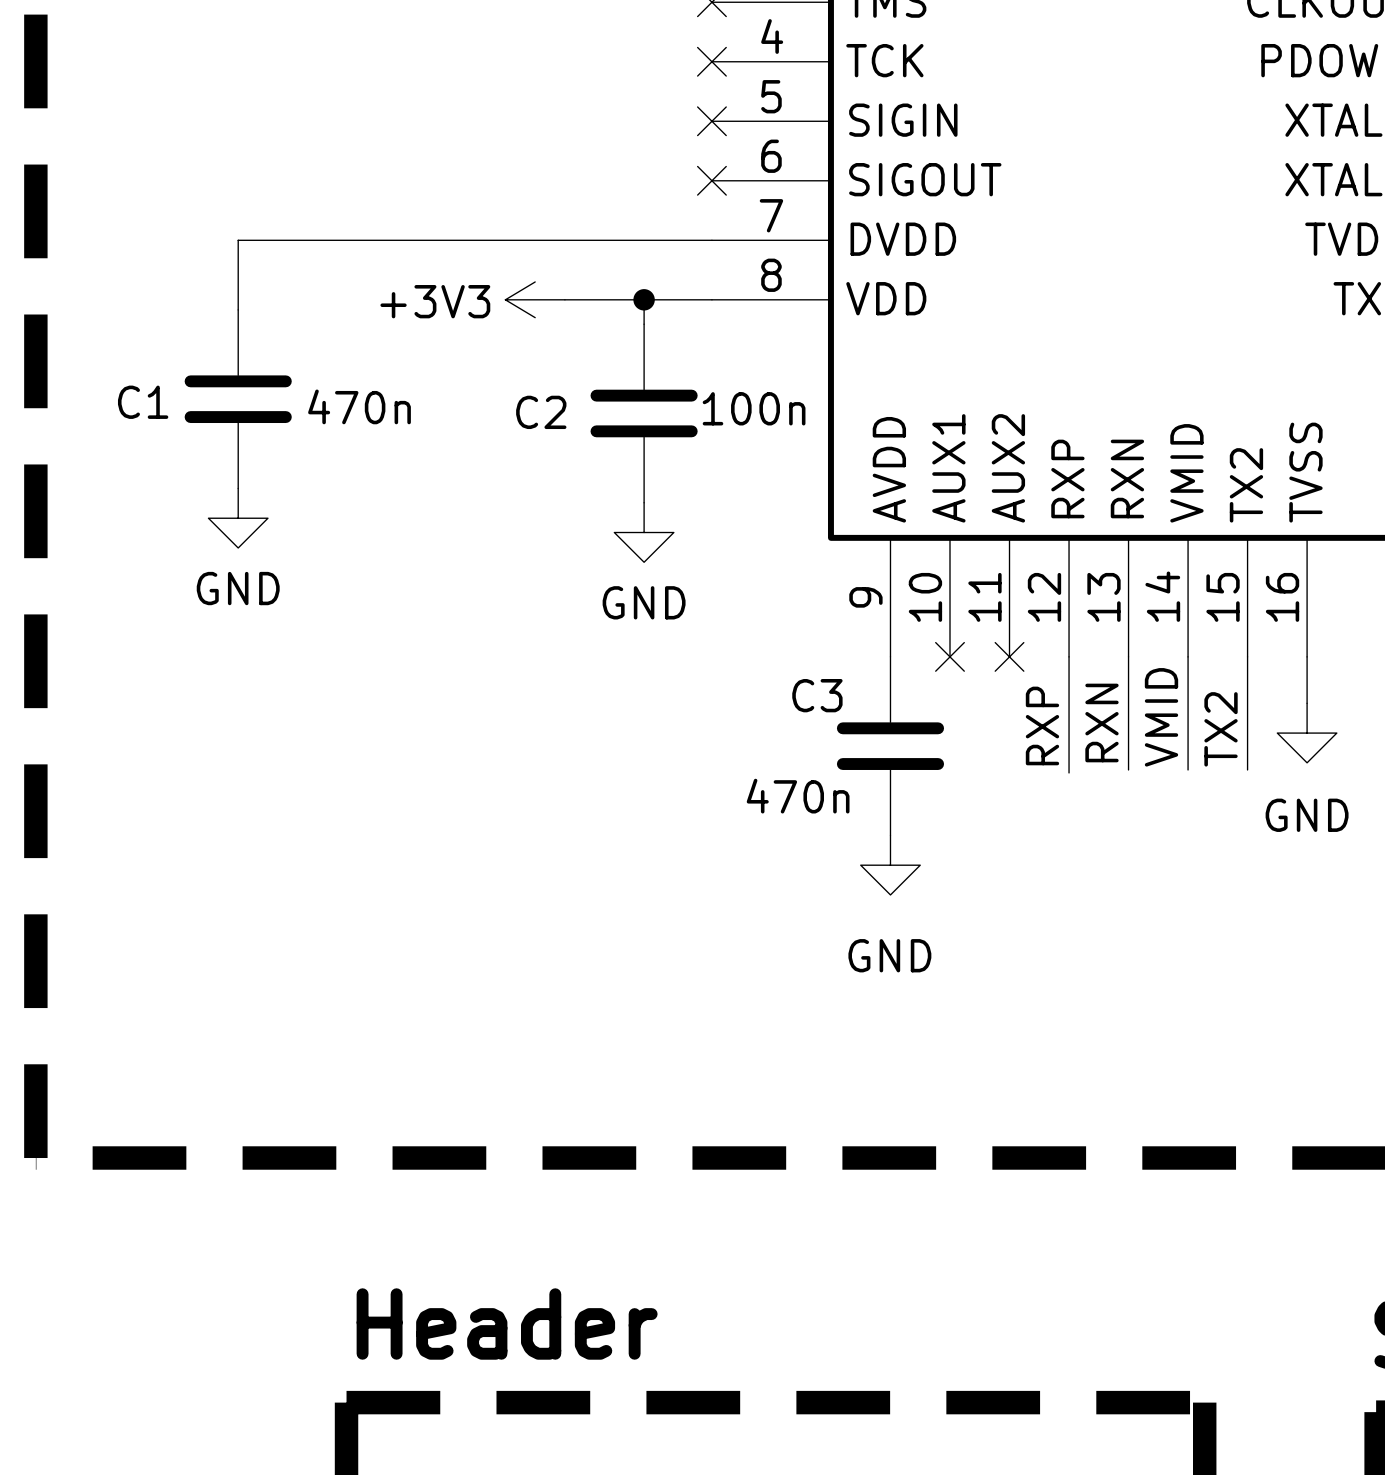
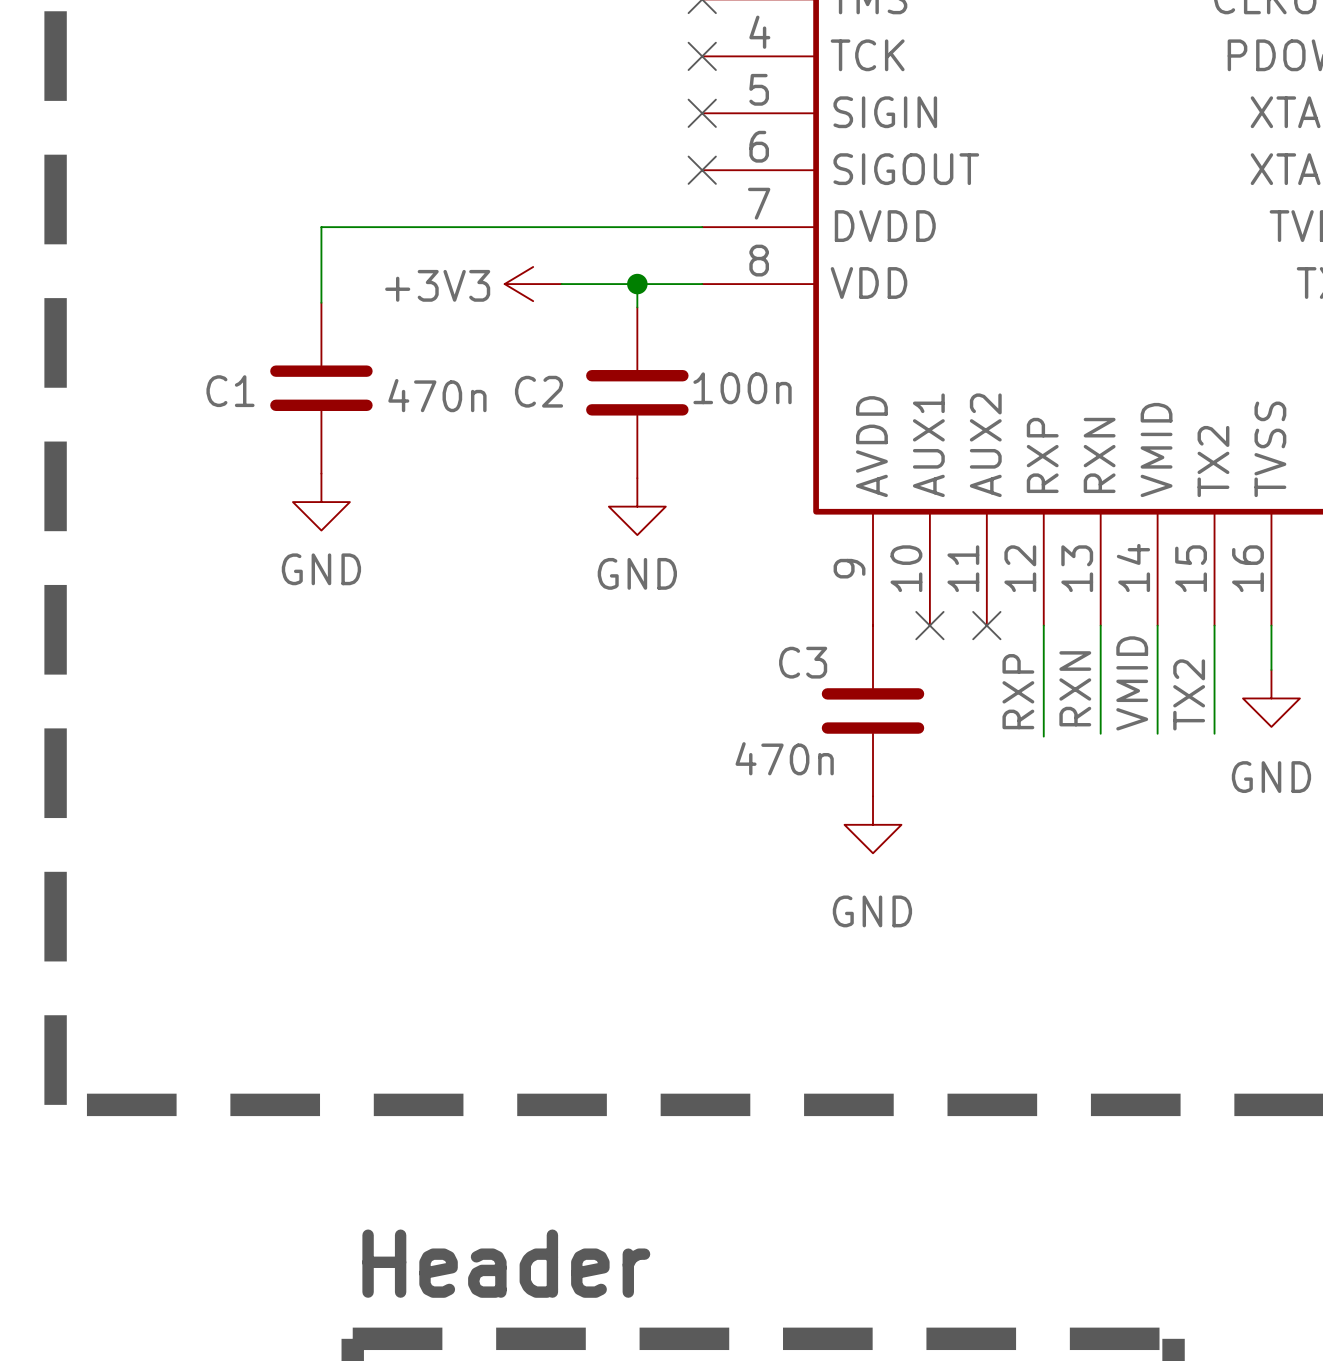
wire: (313, 240) (238, 240) (238, 309) -> (321, 227) (321, 302)
C1 position: (238, 399) -> (321, 388)
power symbol position: GND (238, 518) -> GND (321, 502)

